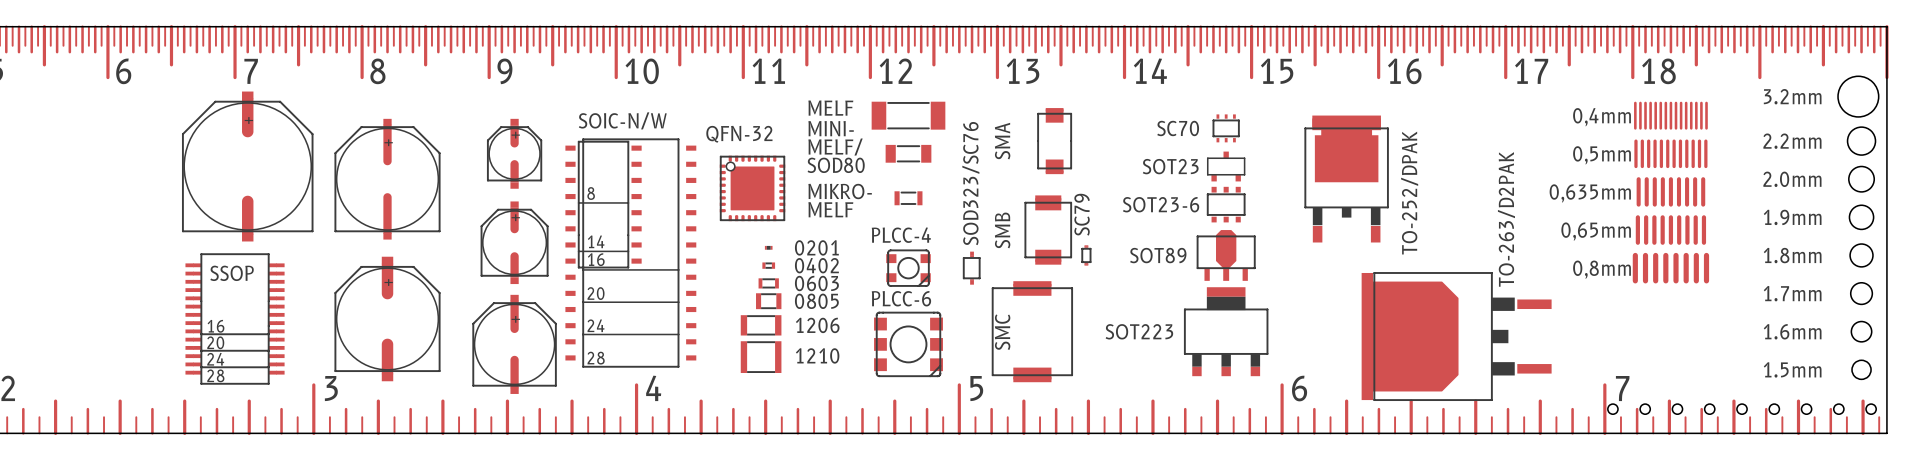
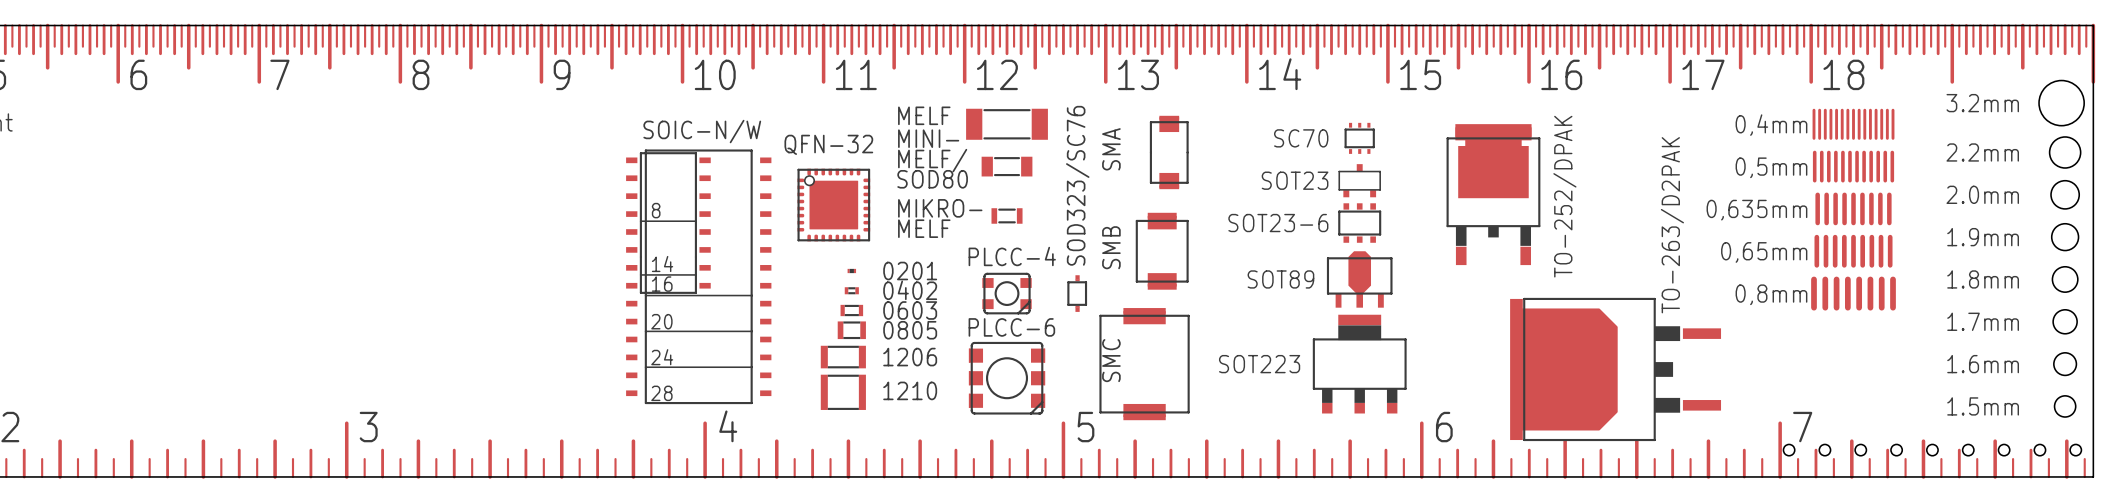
part: (514, 153) -> none
part: (247, 166) -> none
part: (387, 179) -> none
text: SC79 (1082, 214) -> none
part: (514, 242) -> none
part: (1086, 255) -> none
text: SSOP (232, 273) -> none
part: (235, 318) -> none
part: (387, 318) -> none
part: (514, 344) -> none

